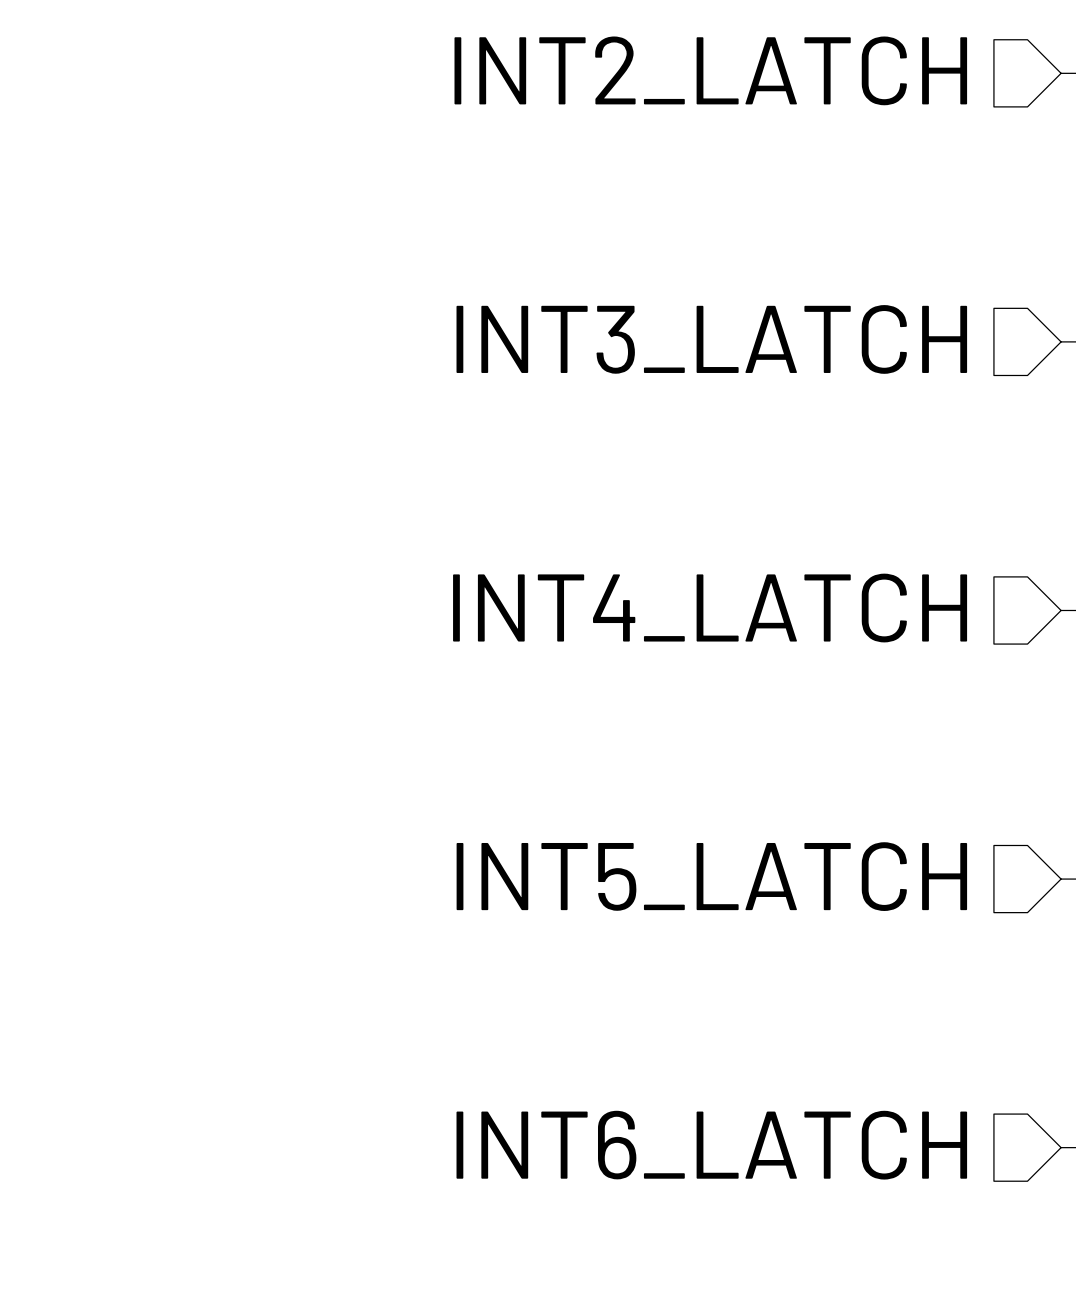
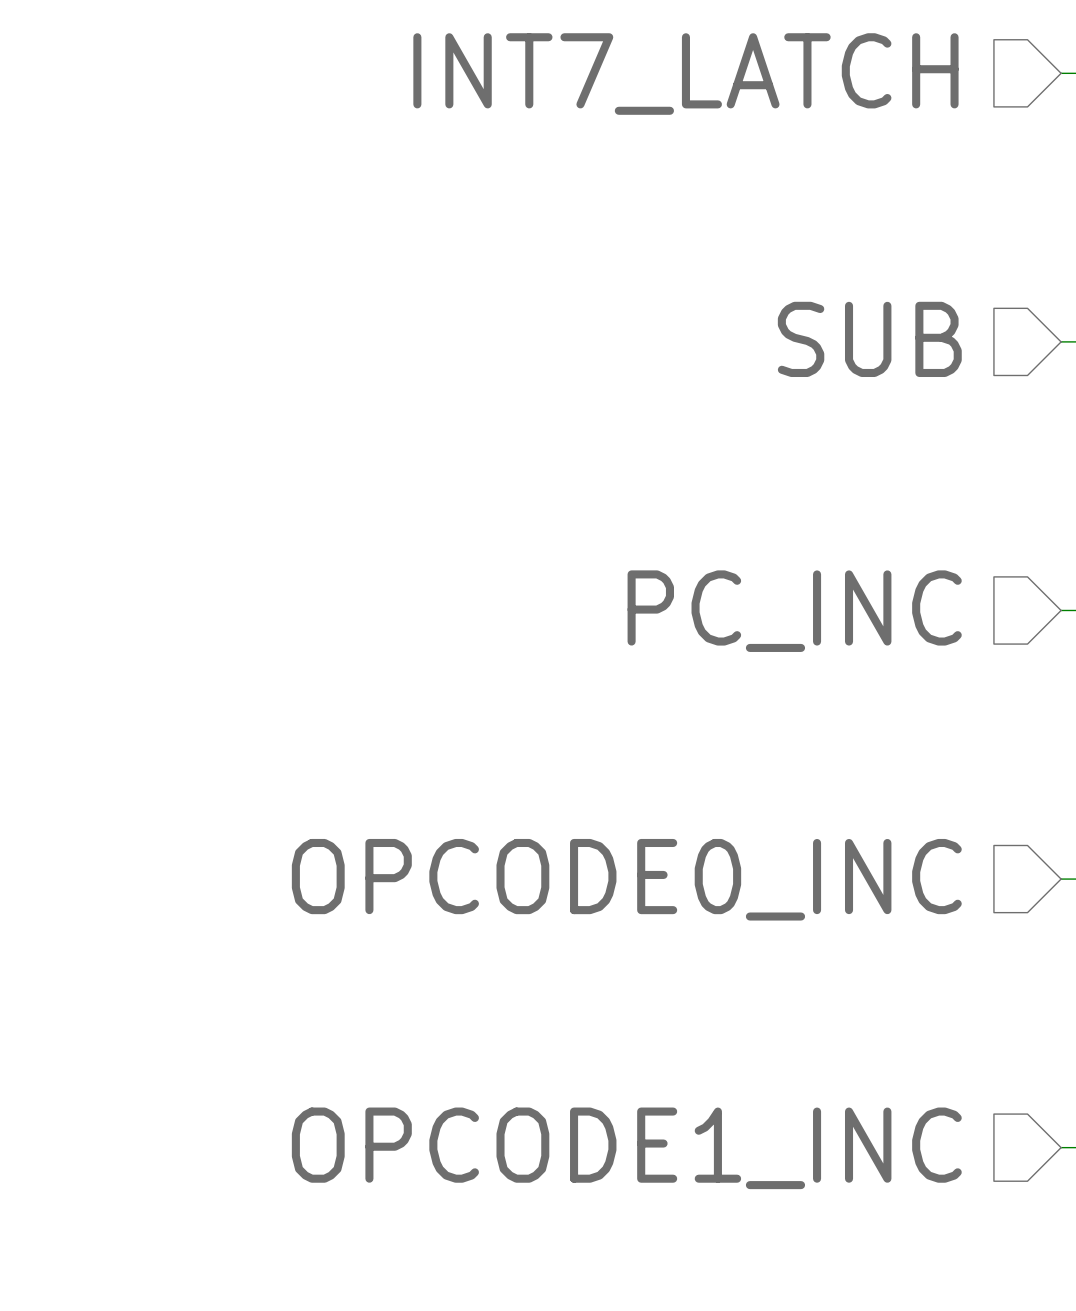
hierarchical label: INT2_LATCH (710, 70) -> INT7_LATCH (685, 74)
hierarchical label: INT3_LATCH (711, 339) -> SUB (869, 339)
hierarchical label: INT4_LATCH (710, 608) -> PC_INC (794, 611)
hierarchical label: INT5_LATCH (711, 876) -> OPCODE0_INC (626, 879)
hierarchical label: INT6_LATCH (711, 1145) -> OPCODE1_INC (626, 1148)

